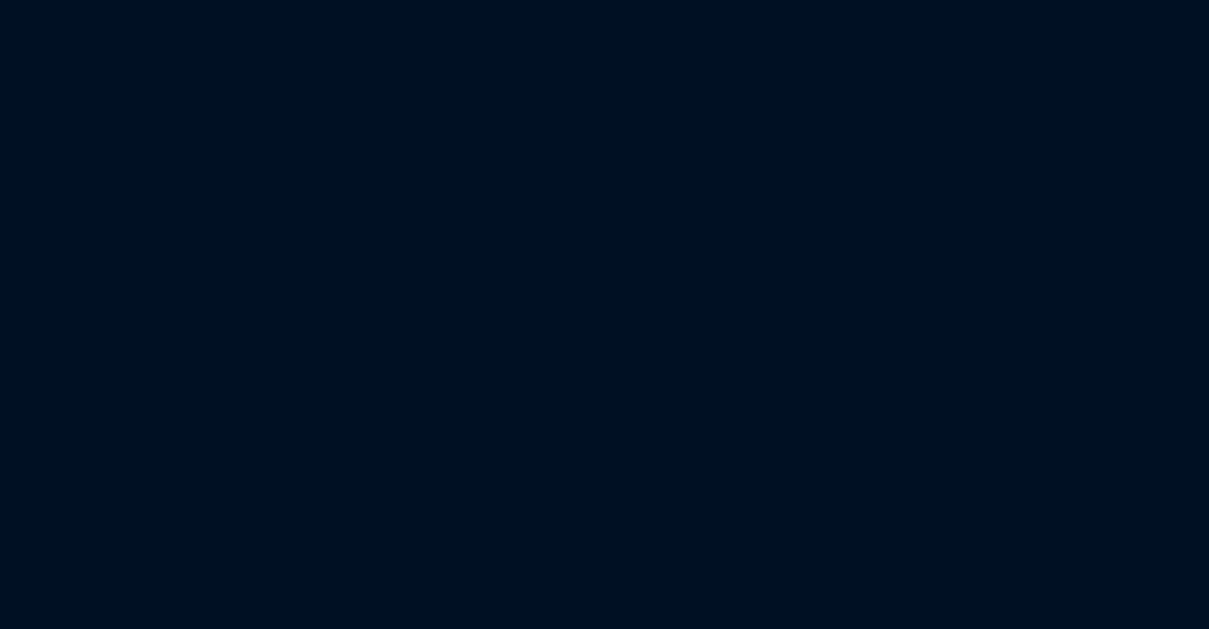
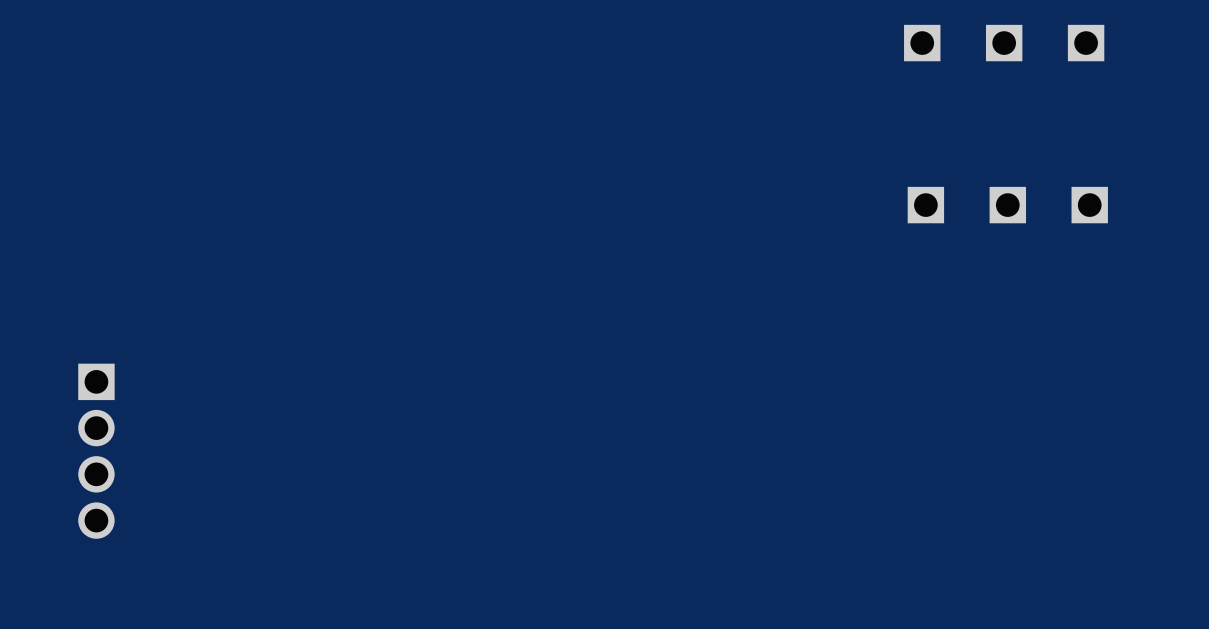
part: none -> (922, 43)
part: none -> (1004, 43)
part: none -> (1086, 43)
part: none -> (925, 205)
part: none -> (1007, 205)
part: none -> (1089, 205)
part: none -> (96, 451)

